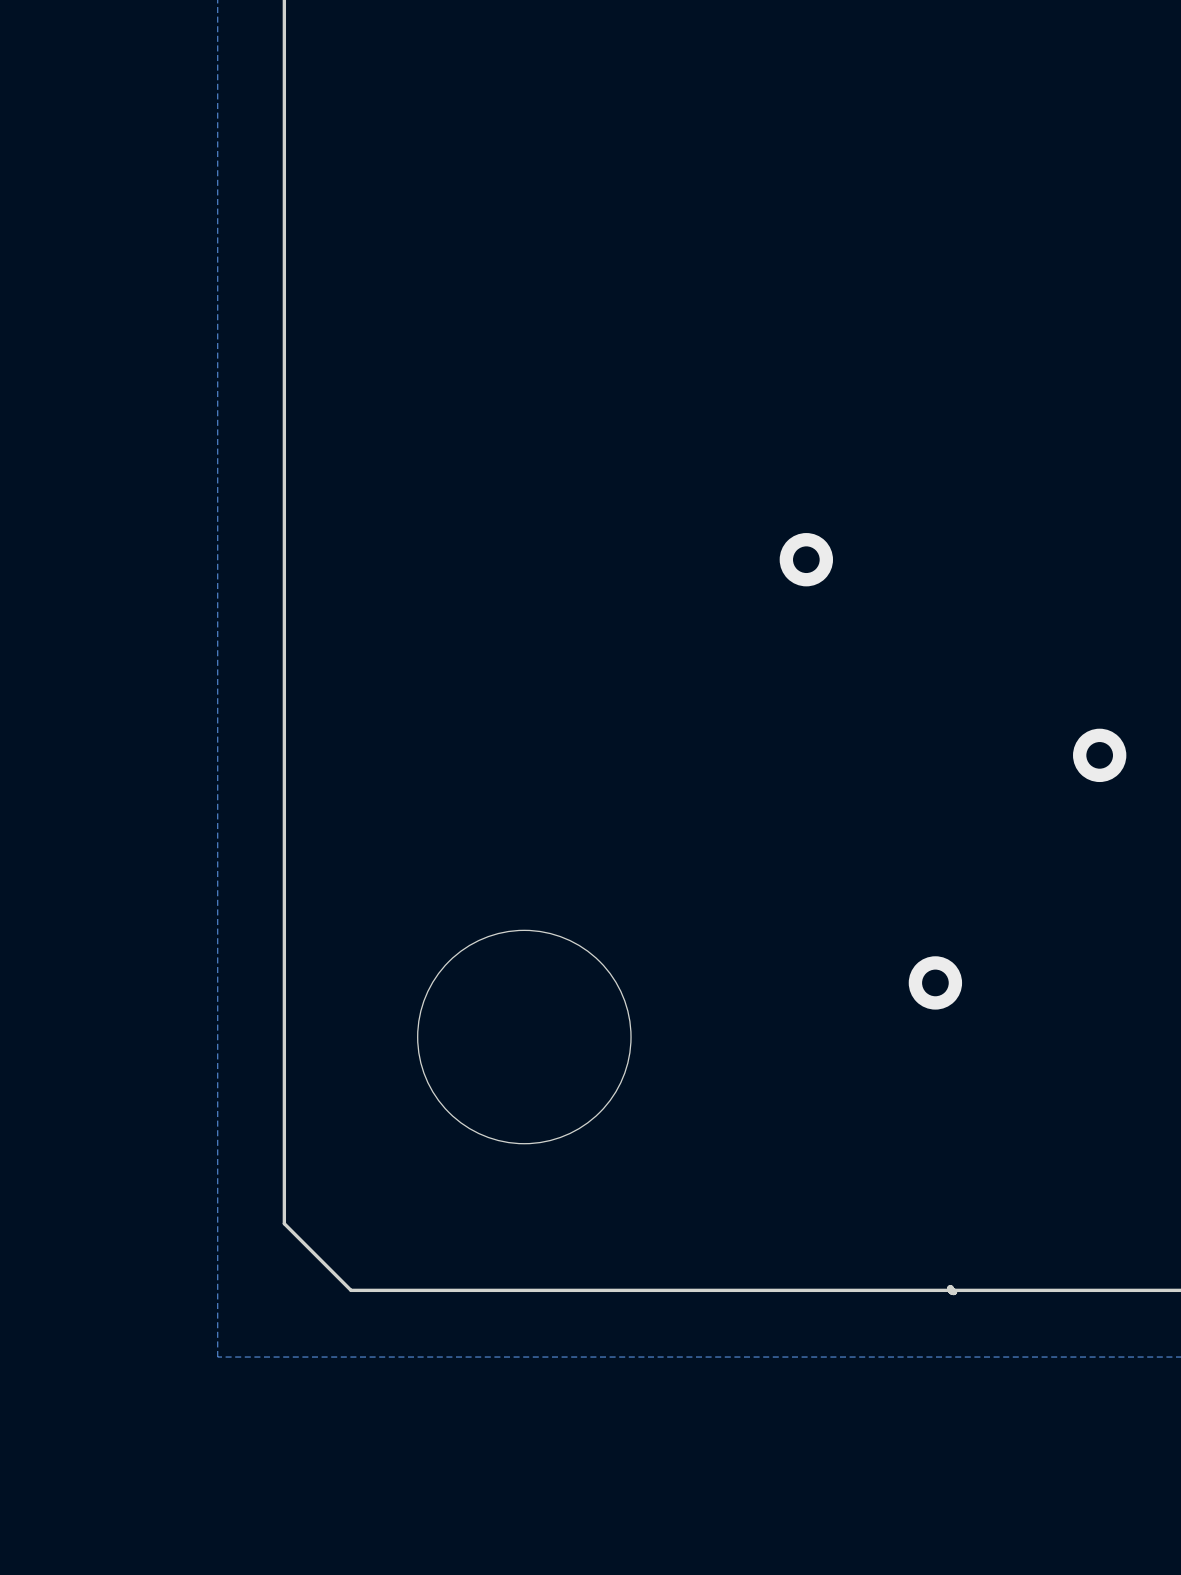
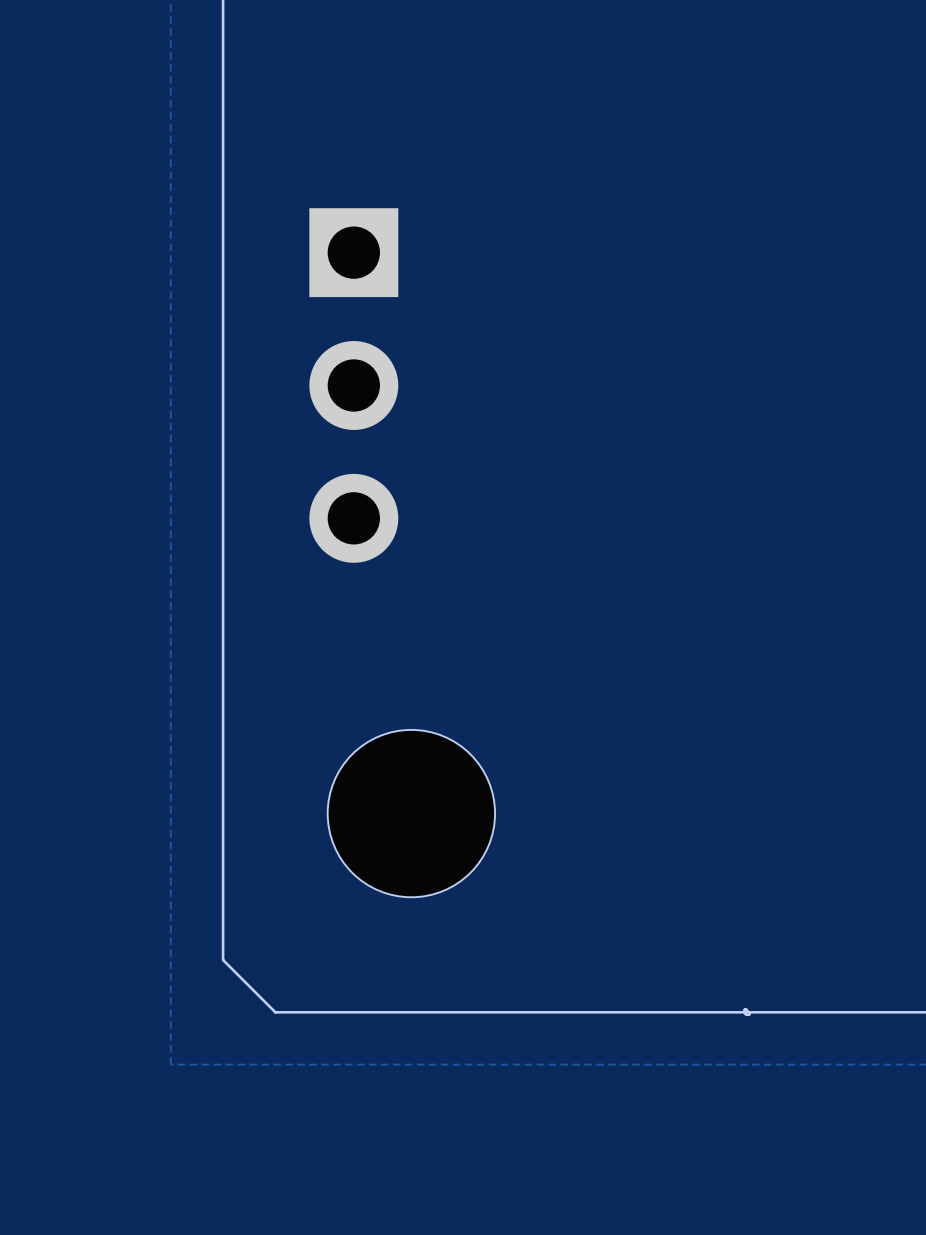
part: none -> (353, 385)
via: (806, 559) -> none
via: (1099, 755) -> none
via: (935, 982) -> none

